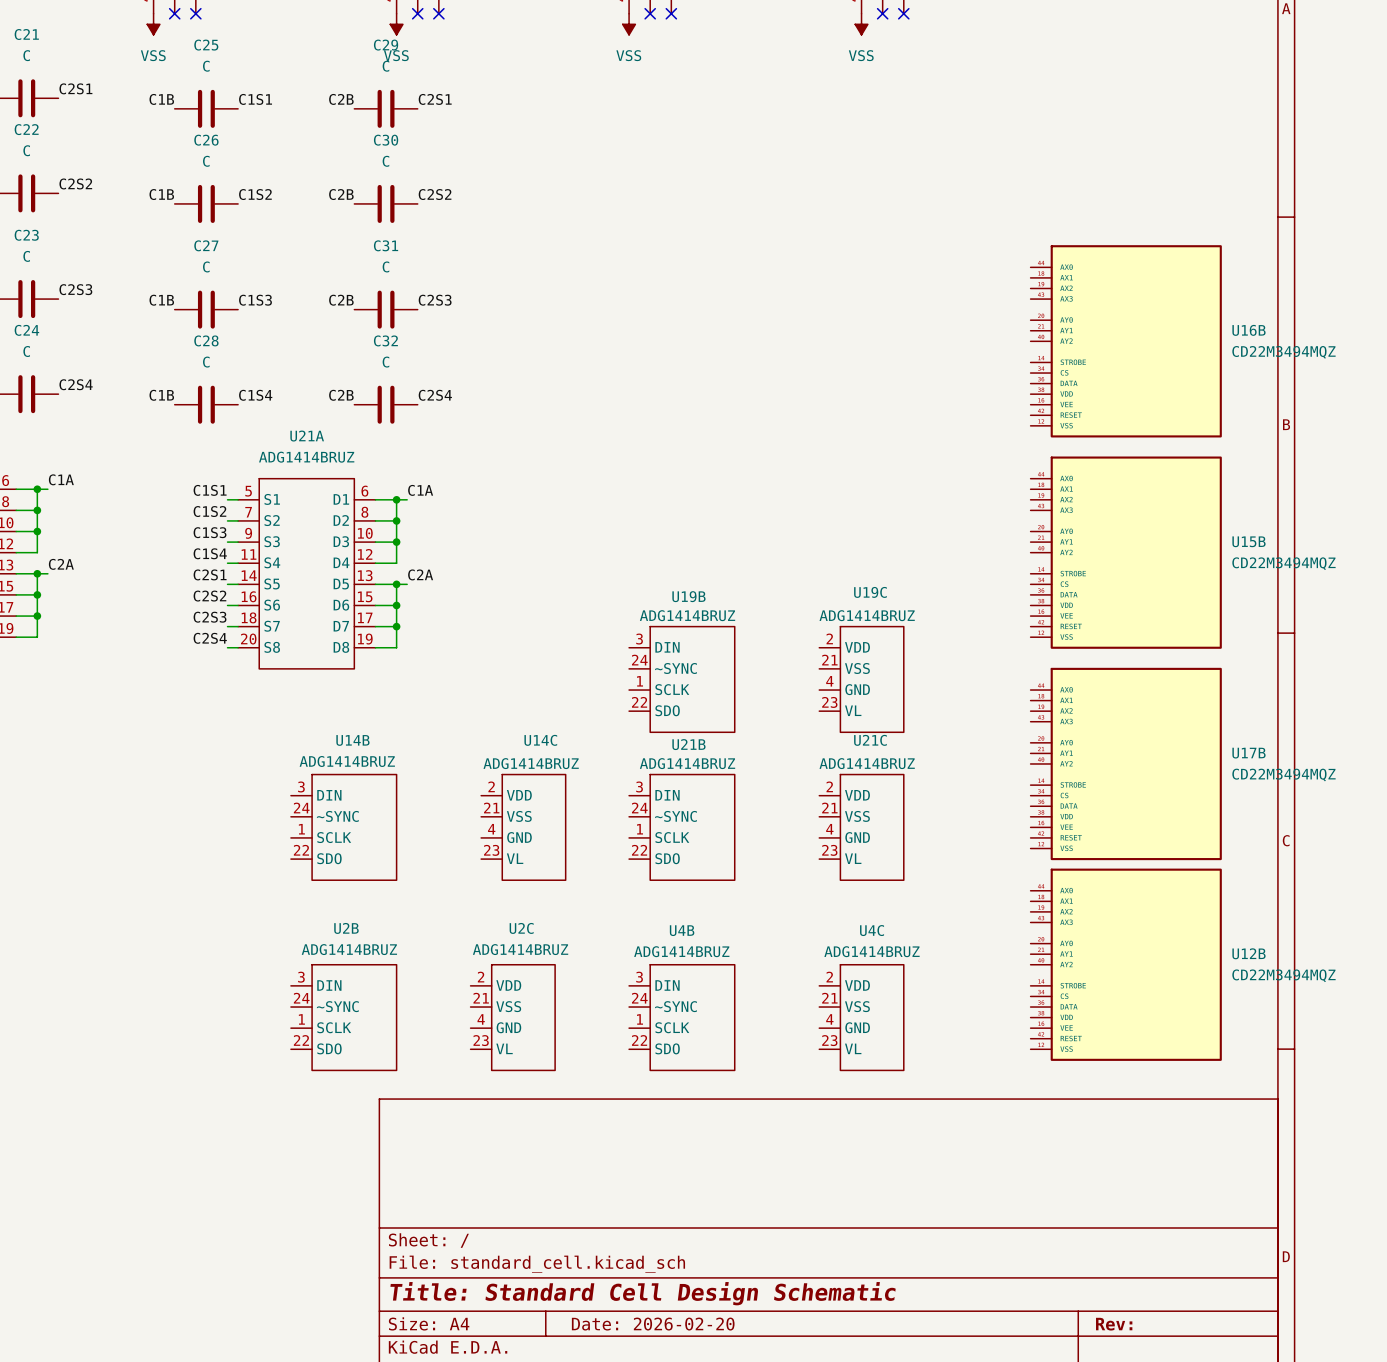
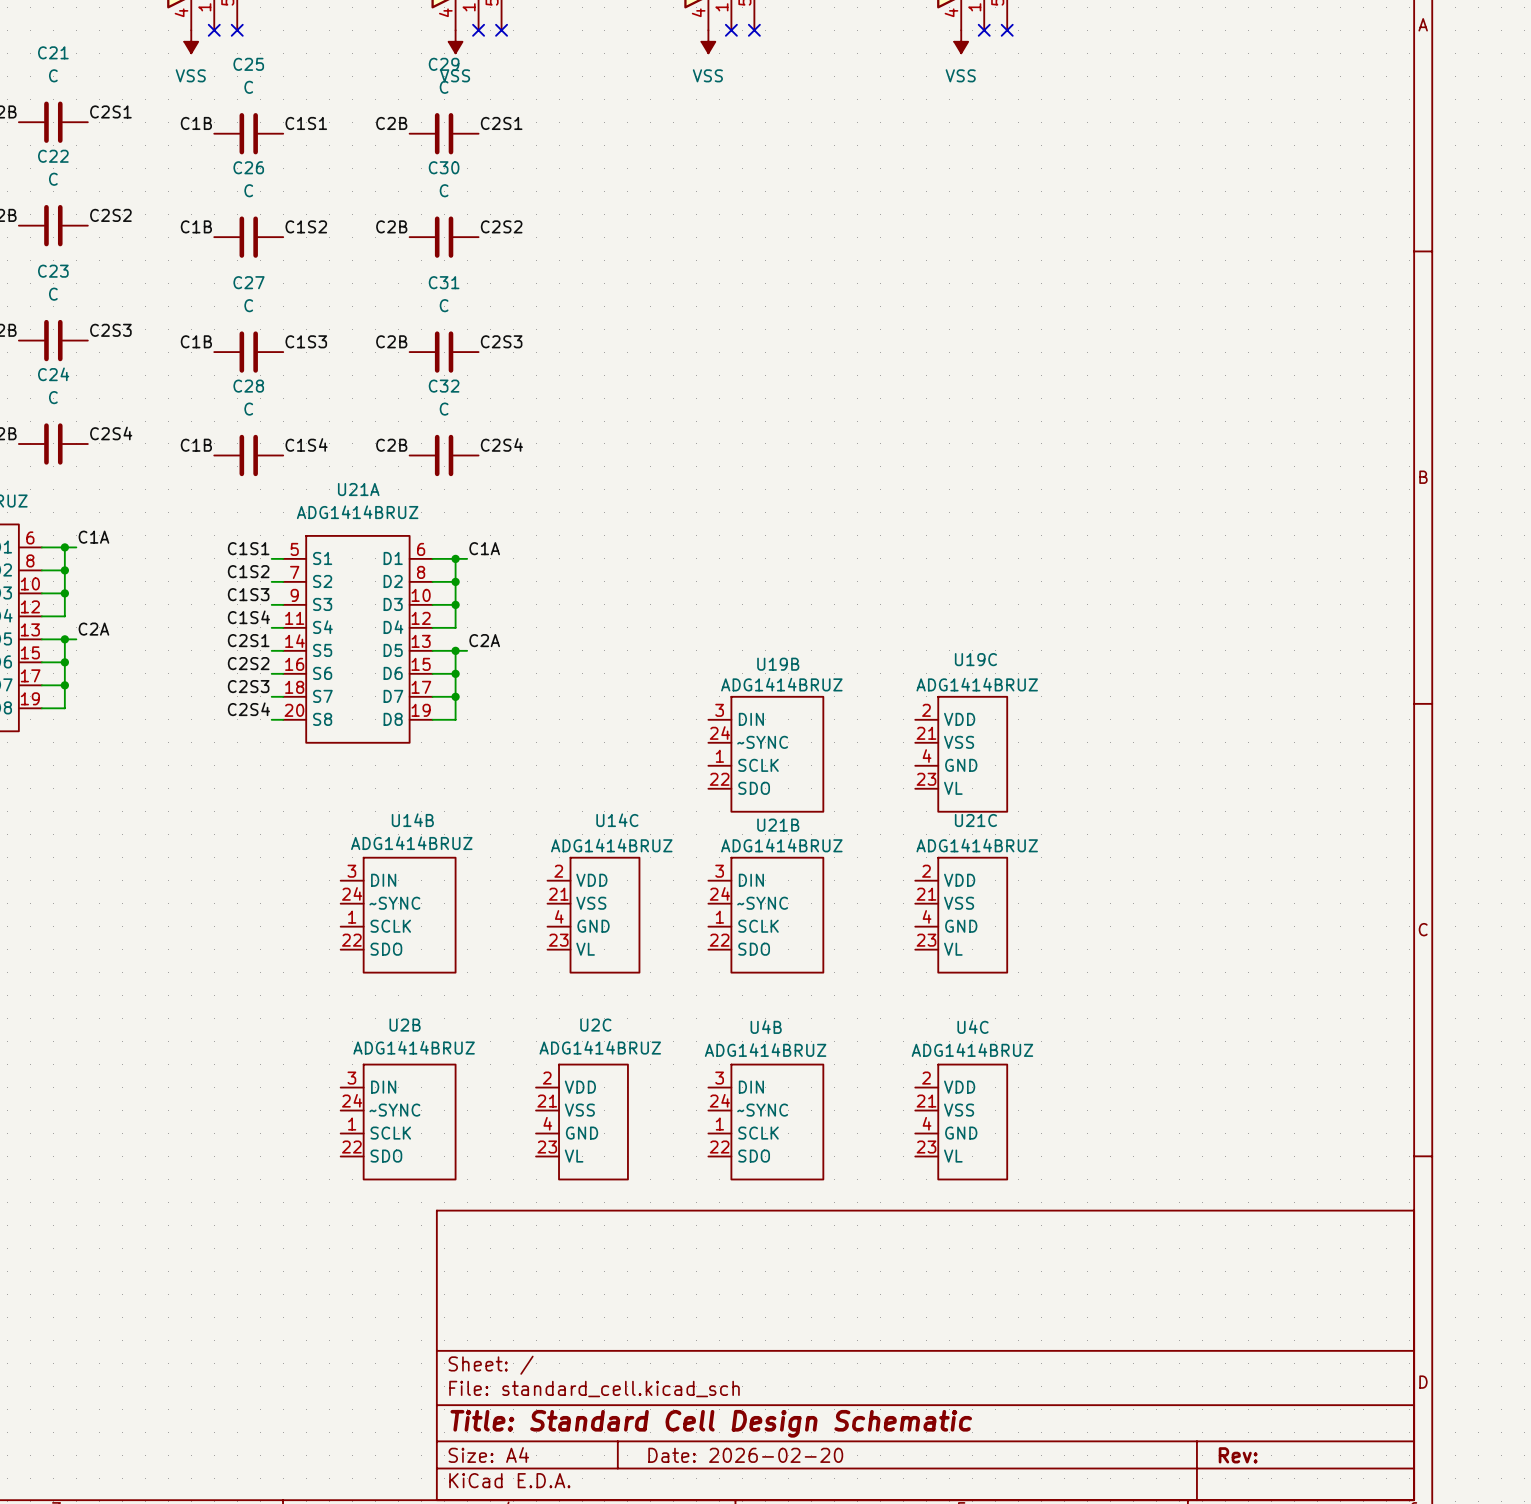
U16B: CD22M3494MQZ (1126, 341) -> none
U15B: CD22M3494MQZ (1126, 552) -> none
U17B: CD22M3494MQZ (1126, 763) -> none
U12B: CD22M3494MQZ (1126, 964) -> none

